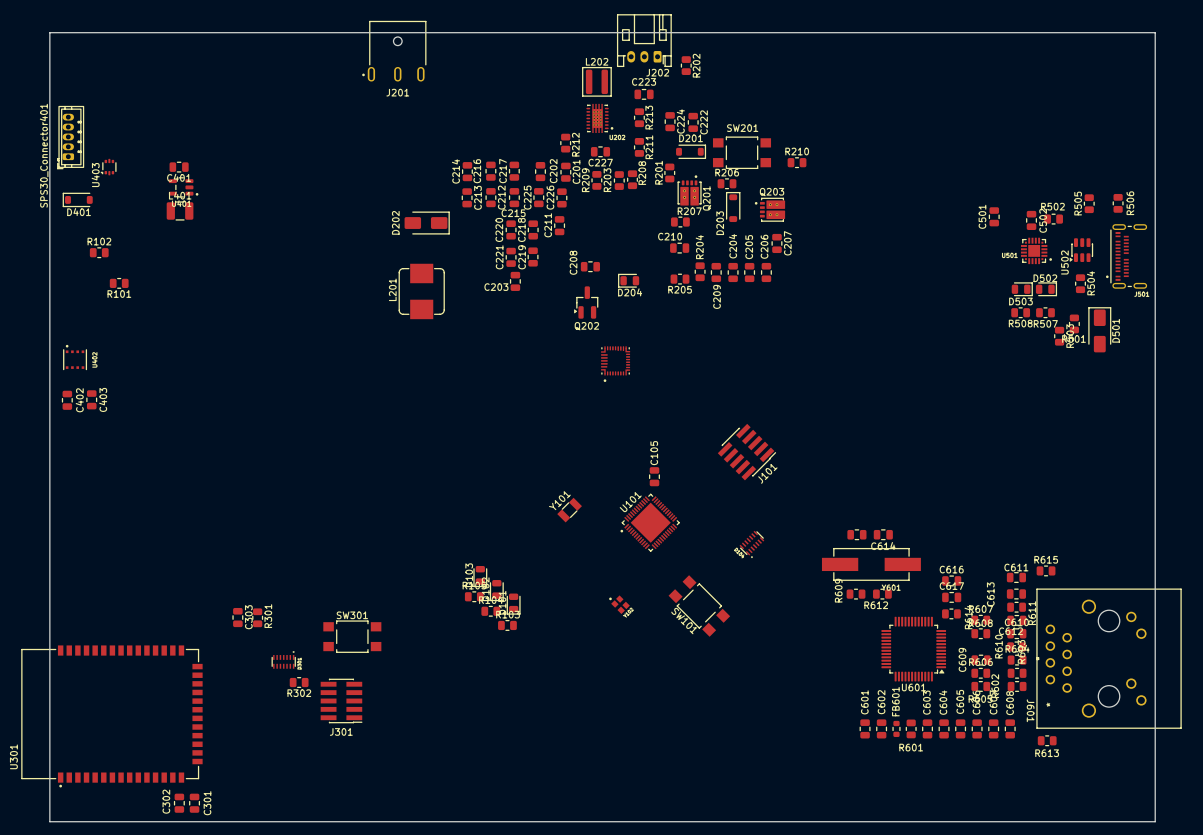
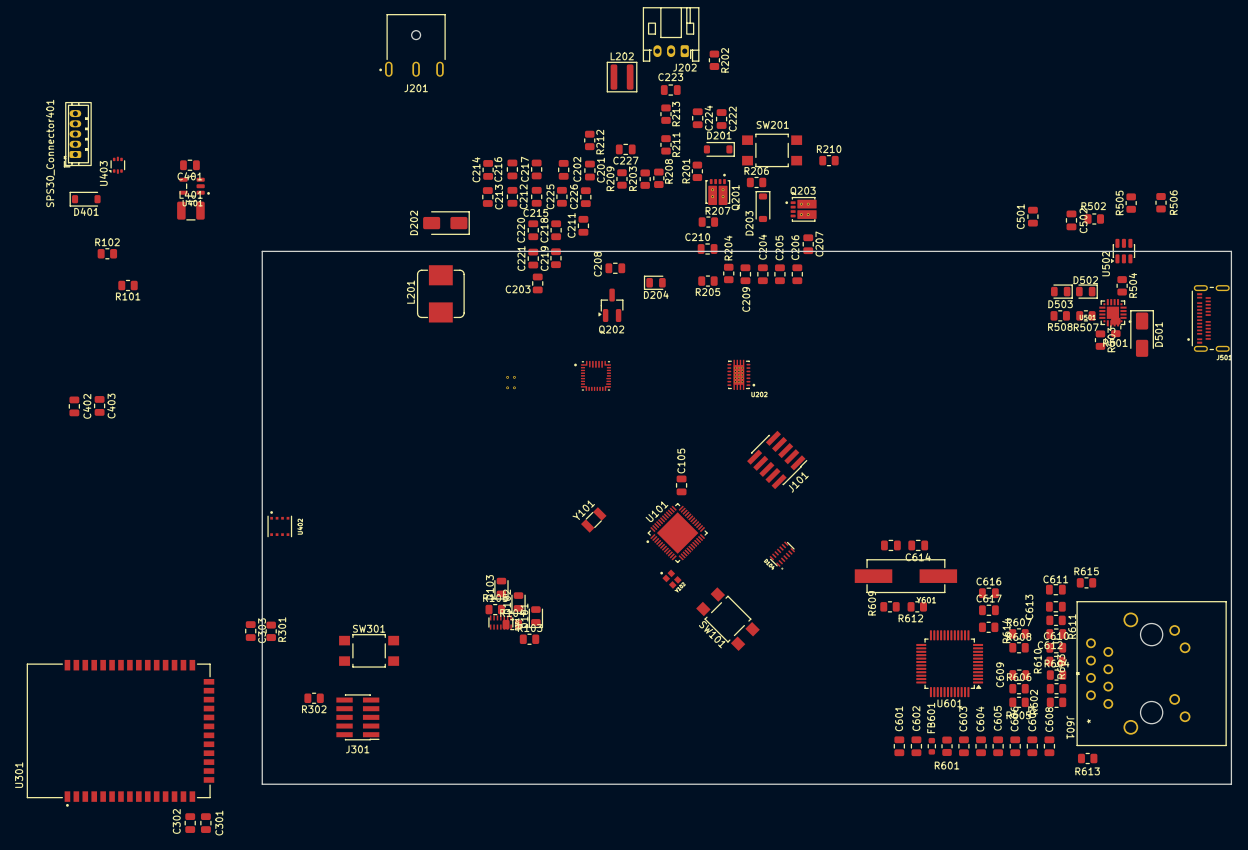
board edge: (49, 32) (1155, 32) (1155, 821) (49, 821) (49, 32) -> (262, 251) (262, 784) (1231, 784) (1231, 251) (262, 251)
part position: (599, 118) -> (741, 374)
part position: (1036, 250) -> (1115, 312)
part position: (1126, 256) -> (1208, 318)
part position: (75, 357) -> (279, 524)
part rotation: 0° (615, 364) -> 90° clockwise (592, 375)
part position: (615, 364) -> (592, 375)
part: none -> (511, 382)
part position: (619, 604) -> (670, 579)
part position: (283, 660) -> (500, 620)

